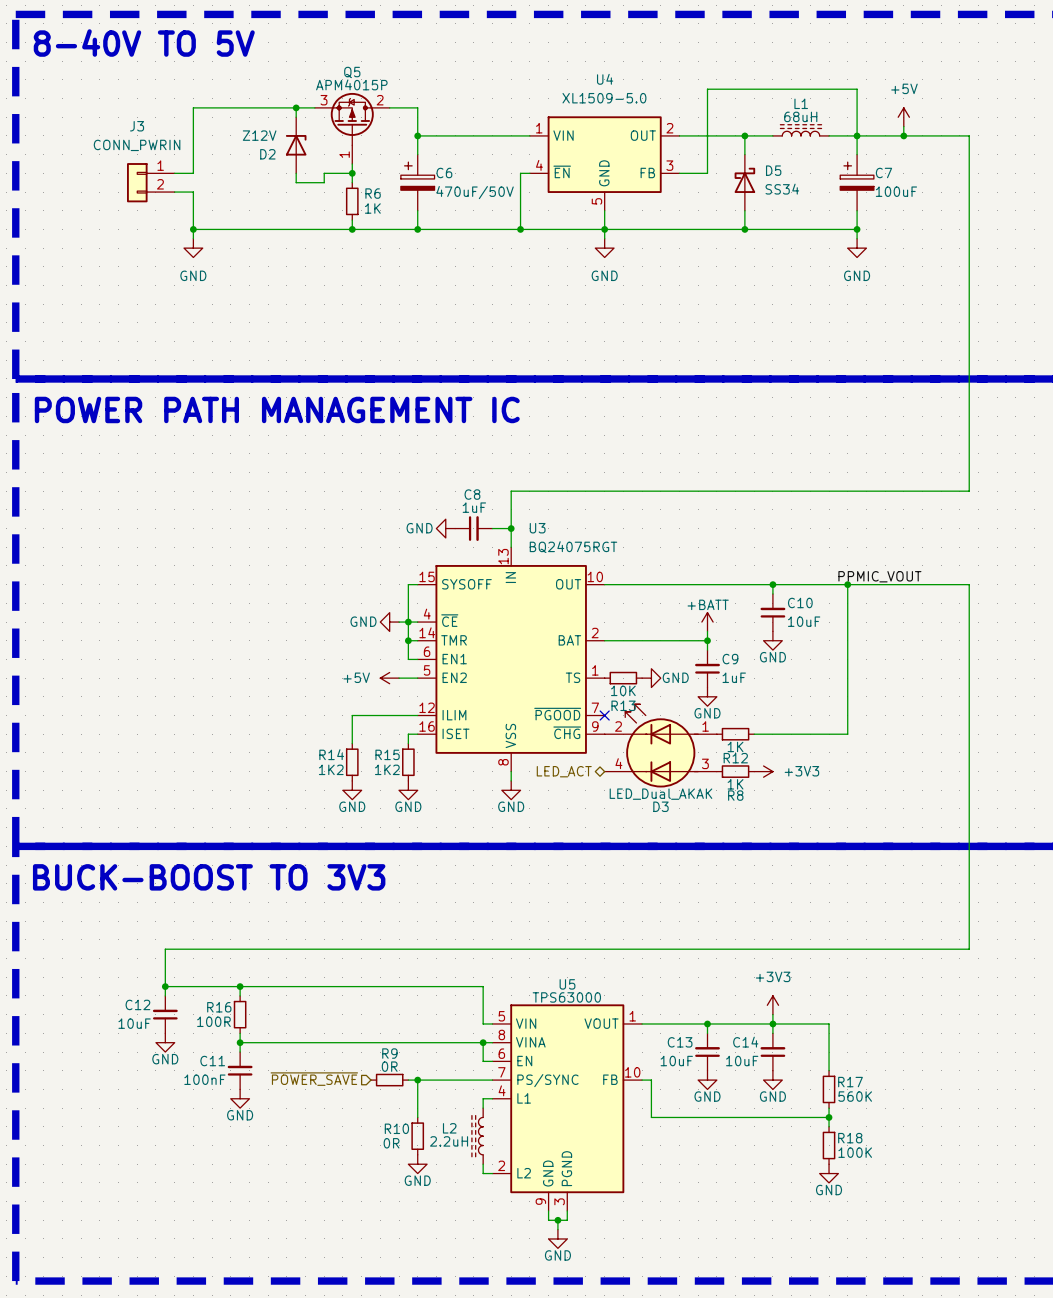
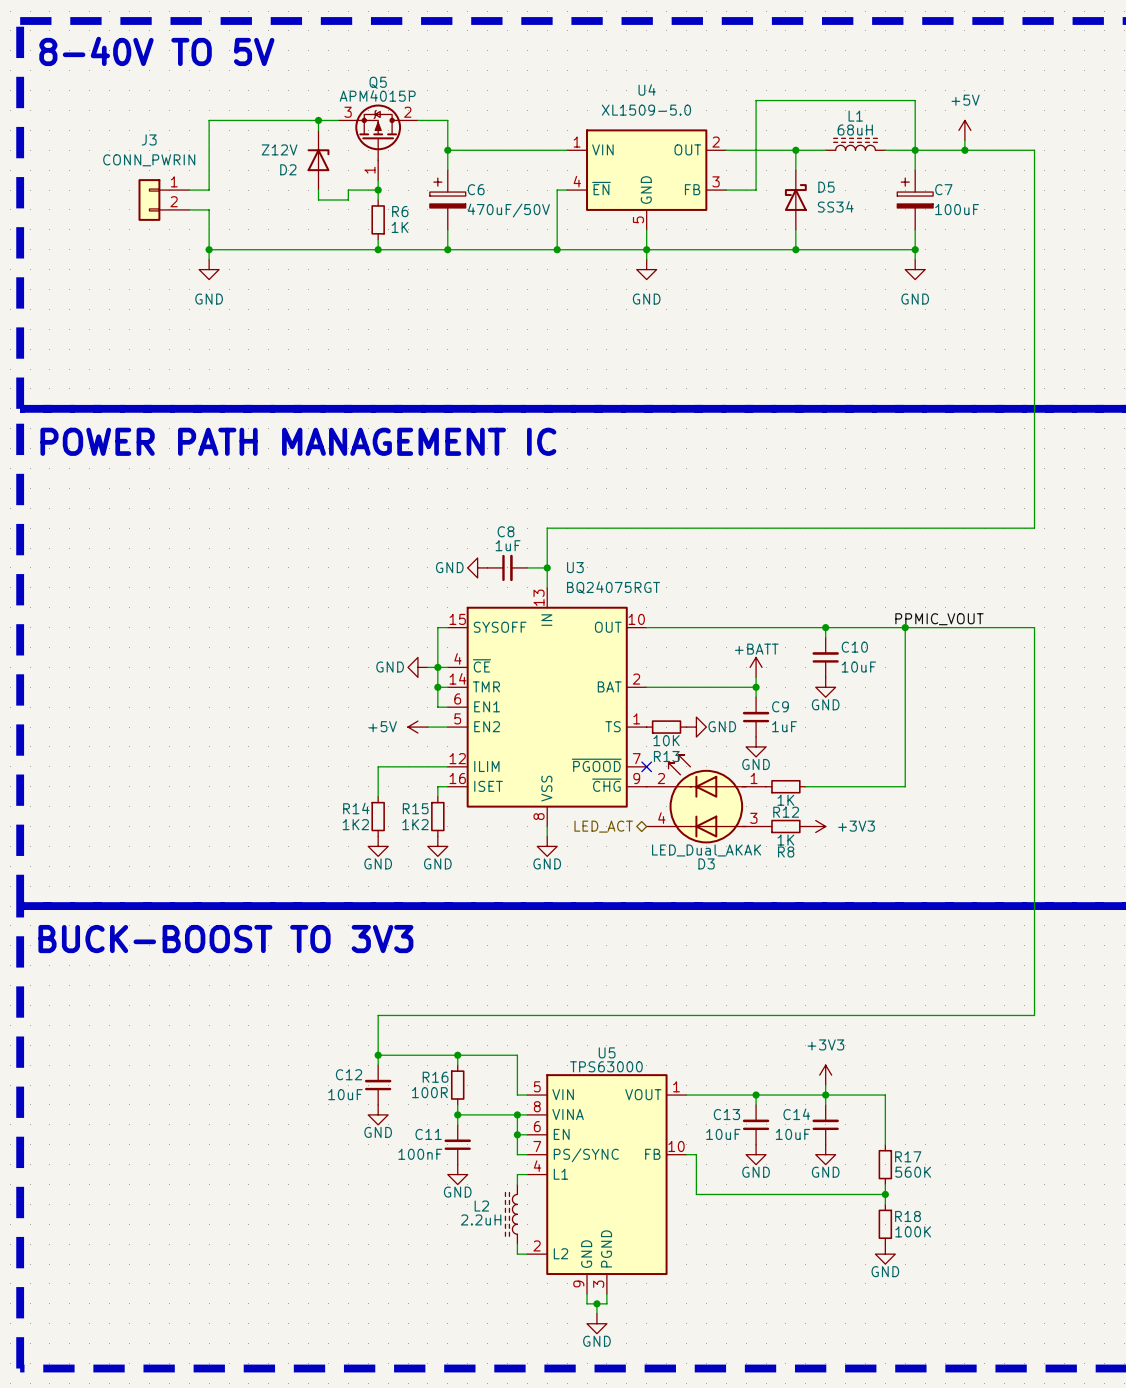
wire: (352, 949) (165, 949) (165, 995) -> (378, 1015) (378, 1065)
wire: (165, 986) (352, 986) -> none
junction: (165, 986) -> none
wire: (240, 986) (240, 995) -> none
junction: (240, 986) -> none
junction: none -> (378, 1055)
wire: none -> (457, 1055) (457, 1065)
junction: none -> (457, 1055)
C12 position: (165, 1014) -> (378, 1085)
R16 position: (240, 1014) -> (457, 1085)
wire: (240, 1033) (240, 1052) -> none
wire: none -> (457, 1104) (457, 1124)
power symbol: GND (165, 1042) -> none
wire: (240, 1042) (427, 1042) -> none
junction: (240, 1042) -> none
power symbol: none -> GND (378, 1114)
junction: none -> (457, 1114)
junction: none -> (517, 1134)
C11 position: (240, 1070) -> (457, 1144)
hierarchical label: ~{POWER_SAVE} (314, 1079) -> none
R9: 0R (389, 1080) -> none
wire: (408, 1080) (483, 1080) -> (517, 1134) (517, 1154)
wire: (417, 1080) (417, 1117) -> none
junction: (417, 1080) -> none
power symbol: GND (240, 1098) -> none
R10: 0R (417, 1136) -> none
power symbol position: GND (417, 1164) -> GND (457, 1174)

